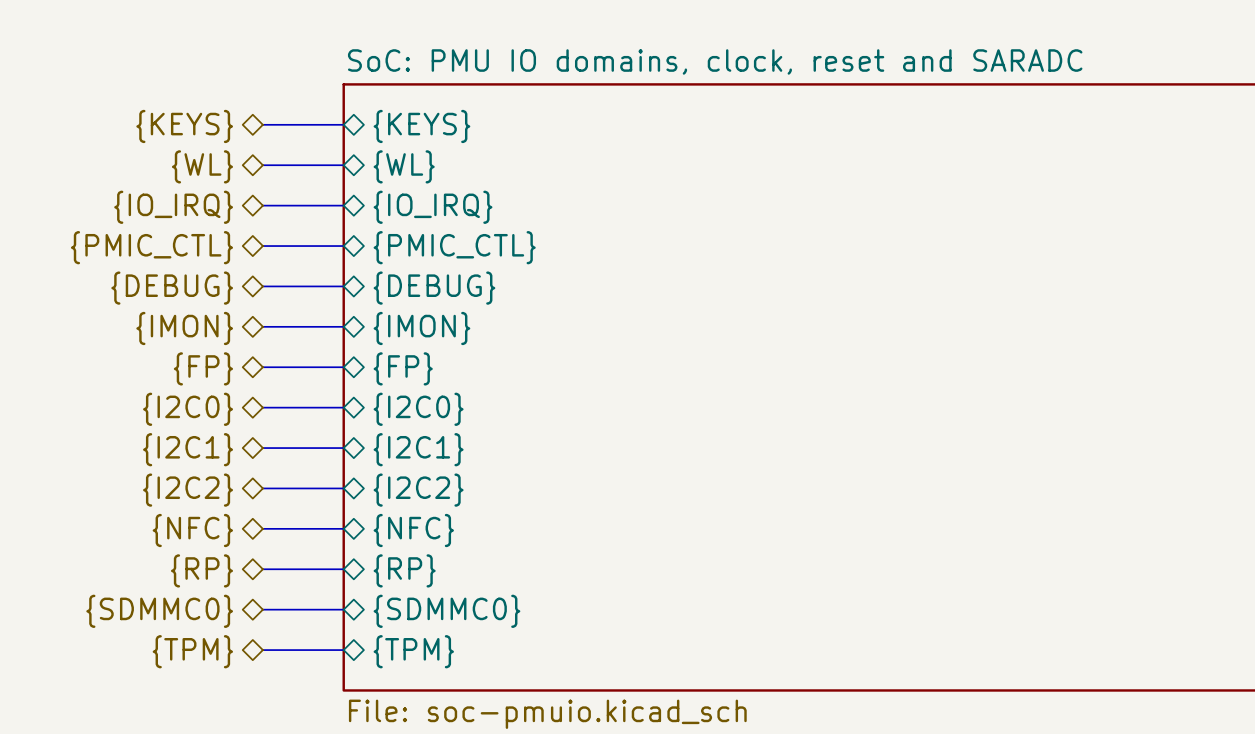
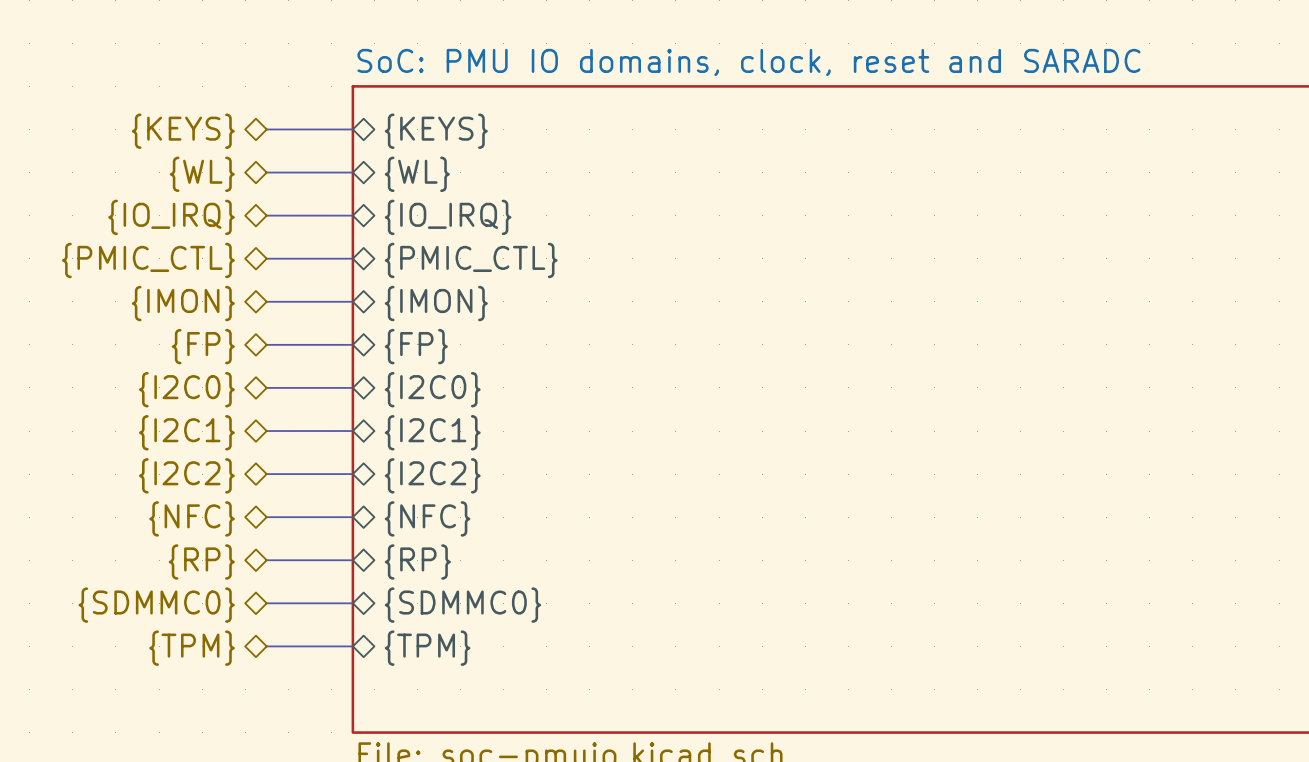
hierarchical label: {DEBUG} (172, 288) -> {IMON} (183, 303)
sheet pin: {DEBUG} (434, 288) -> {IMON} (436, 303)
hierarchical label: {IMON} (184, 328) -> {FP} (203, 346)
sheet pin: {IMON} (421, 328) -> {FP} (416, 346)
hierarchical label: {FP} (203, 368) -> {I2C0} (186, 389)
sheet pin: {FP} (403, 368) -> {I2C0} (432, 389)
hierarchical label: {I2C0} (188, 409) -> {I2C1} (186, 432)
sheet pin: {I2C0} (418, 409) -> {I2C1} (432, 432)
hierarchical label: {I2C1} (188, 449) -> {I2C2} (186, 475)
sheet pin: {I2C1} (418, 449) -> {I2C2} (432, 475)
hierarchical label: {I2C2} (188, 490) -> {NFC} (192, 518)
sheet pin: {I2C2} (418, 490) -> {NFC} (427, 518)
hierarchical label: {NFC} (192, 530) -> {RP} (201, 562)
sheet pin: {NFC} (413, 530) -> {RP} (417, 562)
hierarchical label: {RP} (201, 570) -> {SDMMC0} (156, 605)
sheet pin: {RP} (404, 570) -> {SDMMC0} (462, 605)
hierarchical label: {SDMMC0} (159, 611) -> {TPM} (192, 648)
sheet pin: {SDMMC0} (446, 611) -> {TPM} (427, 648)
bus: (262, 650) (343, 650) -> none
hierarchical label: {TPM} (192, 651) -> none
sheet pin: {TPM} (413, 651) -> none

